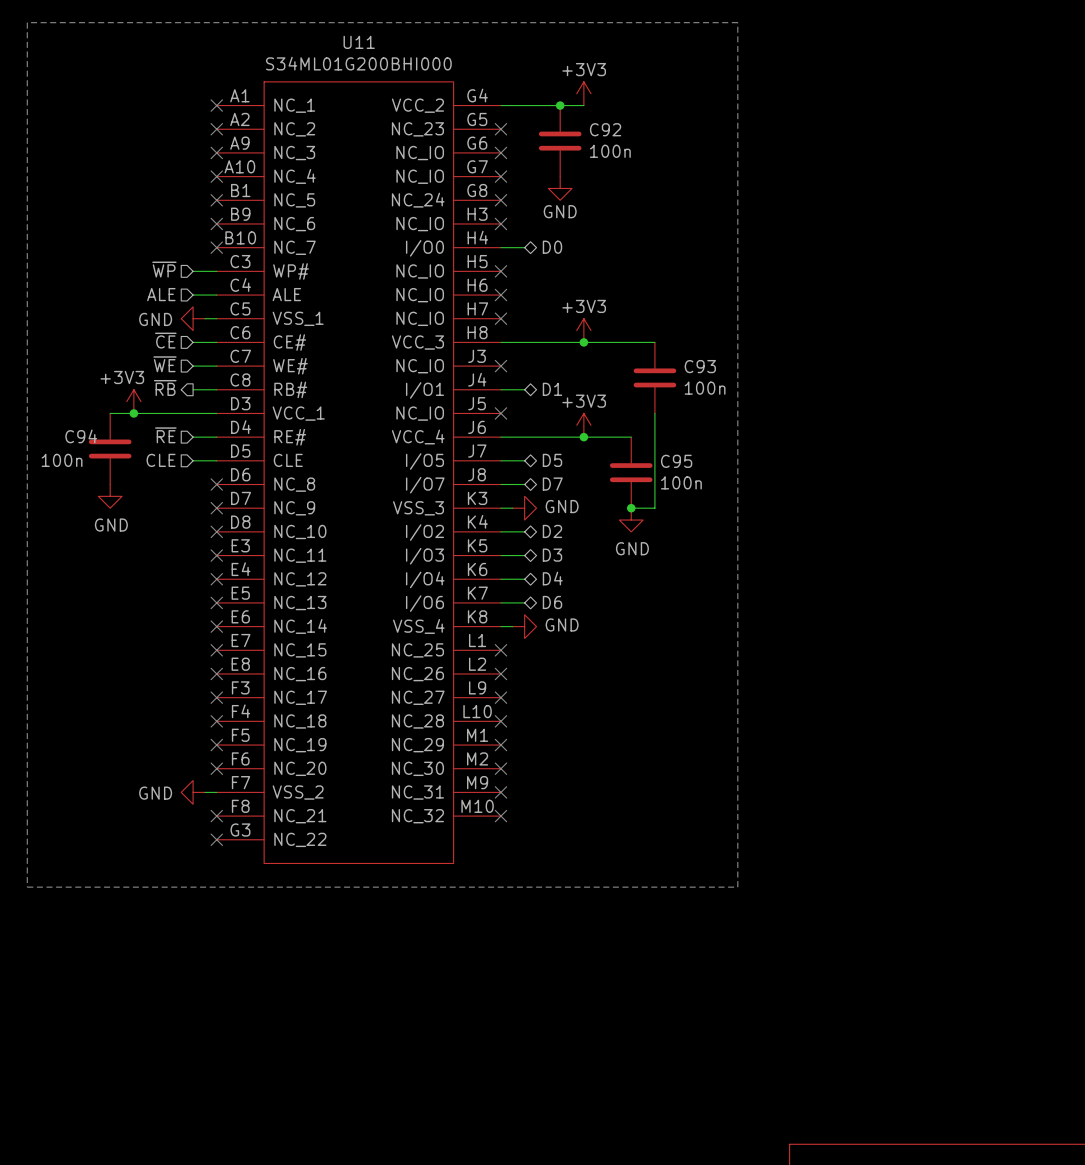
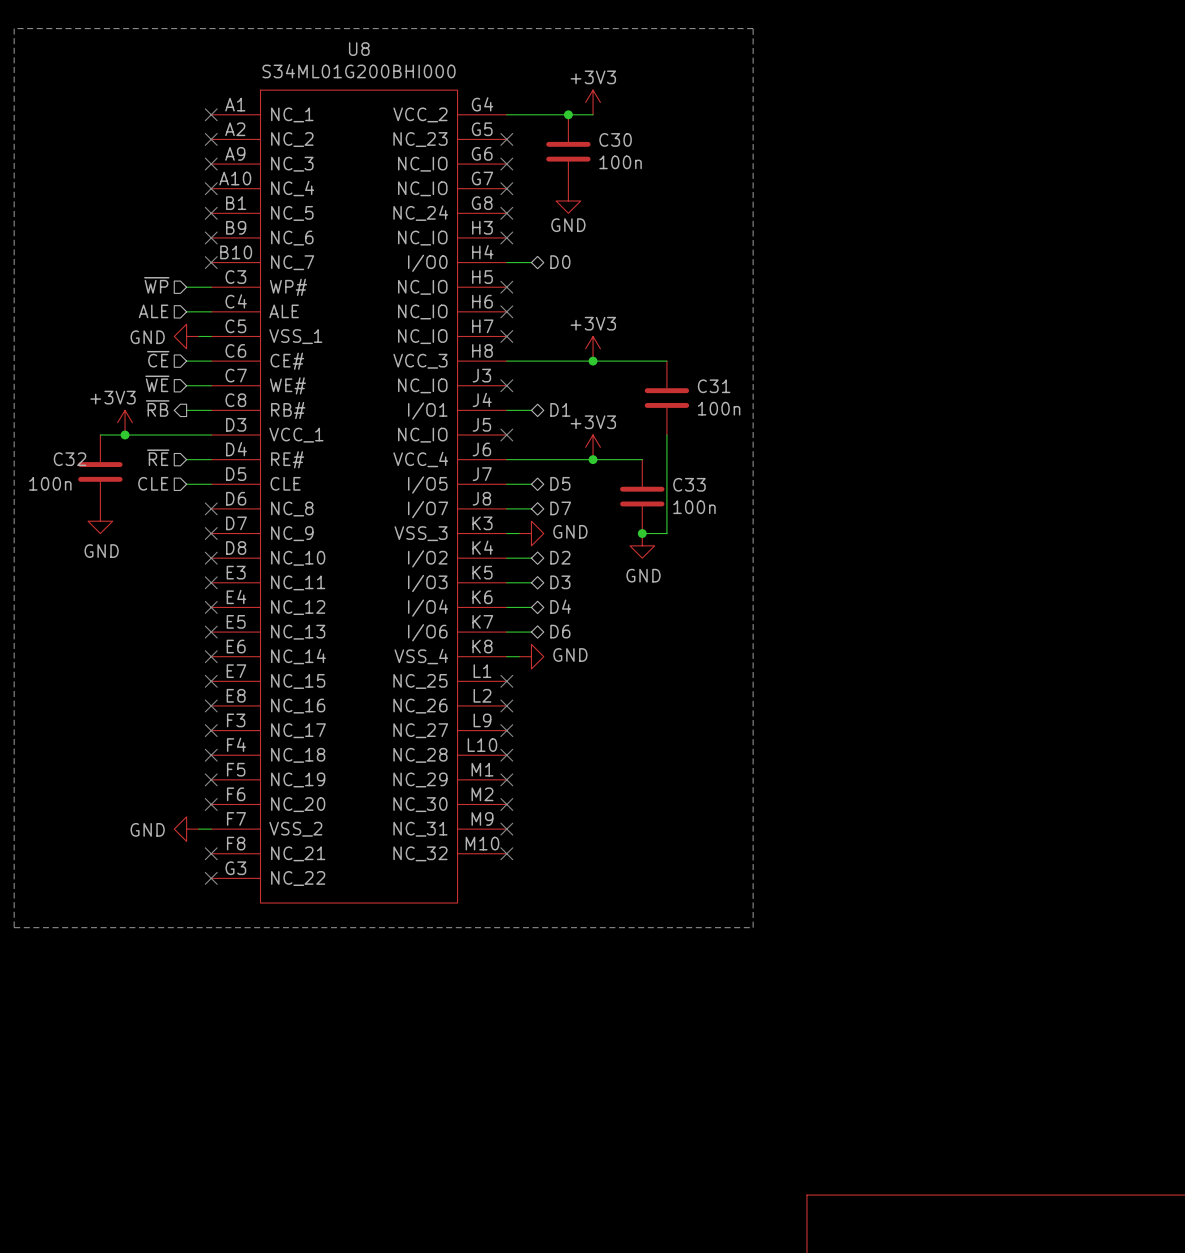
U11 name: U11 (359, 42) -> U8 (359, 49)
C92 name: C92 (605, 129) -> C30 (615, 139)
C93 name: C93 (700, 366) -> C31 (714, 386)
C94 name: C94 (81, 436) -> C32 (69, 459)
C95 name: C95 (676, 461) -> C33 (689, 484)

